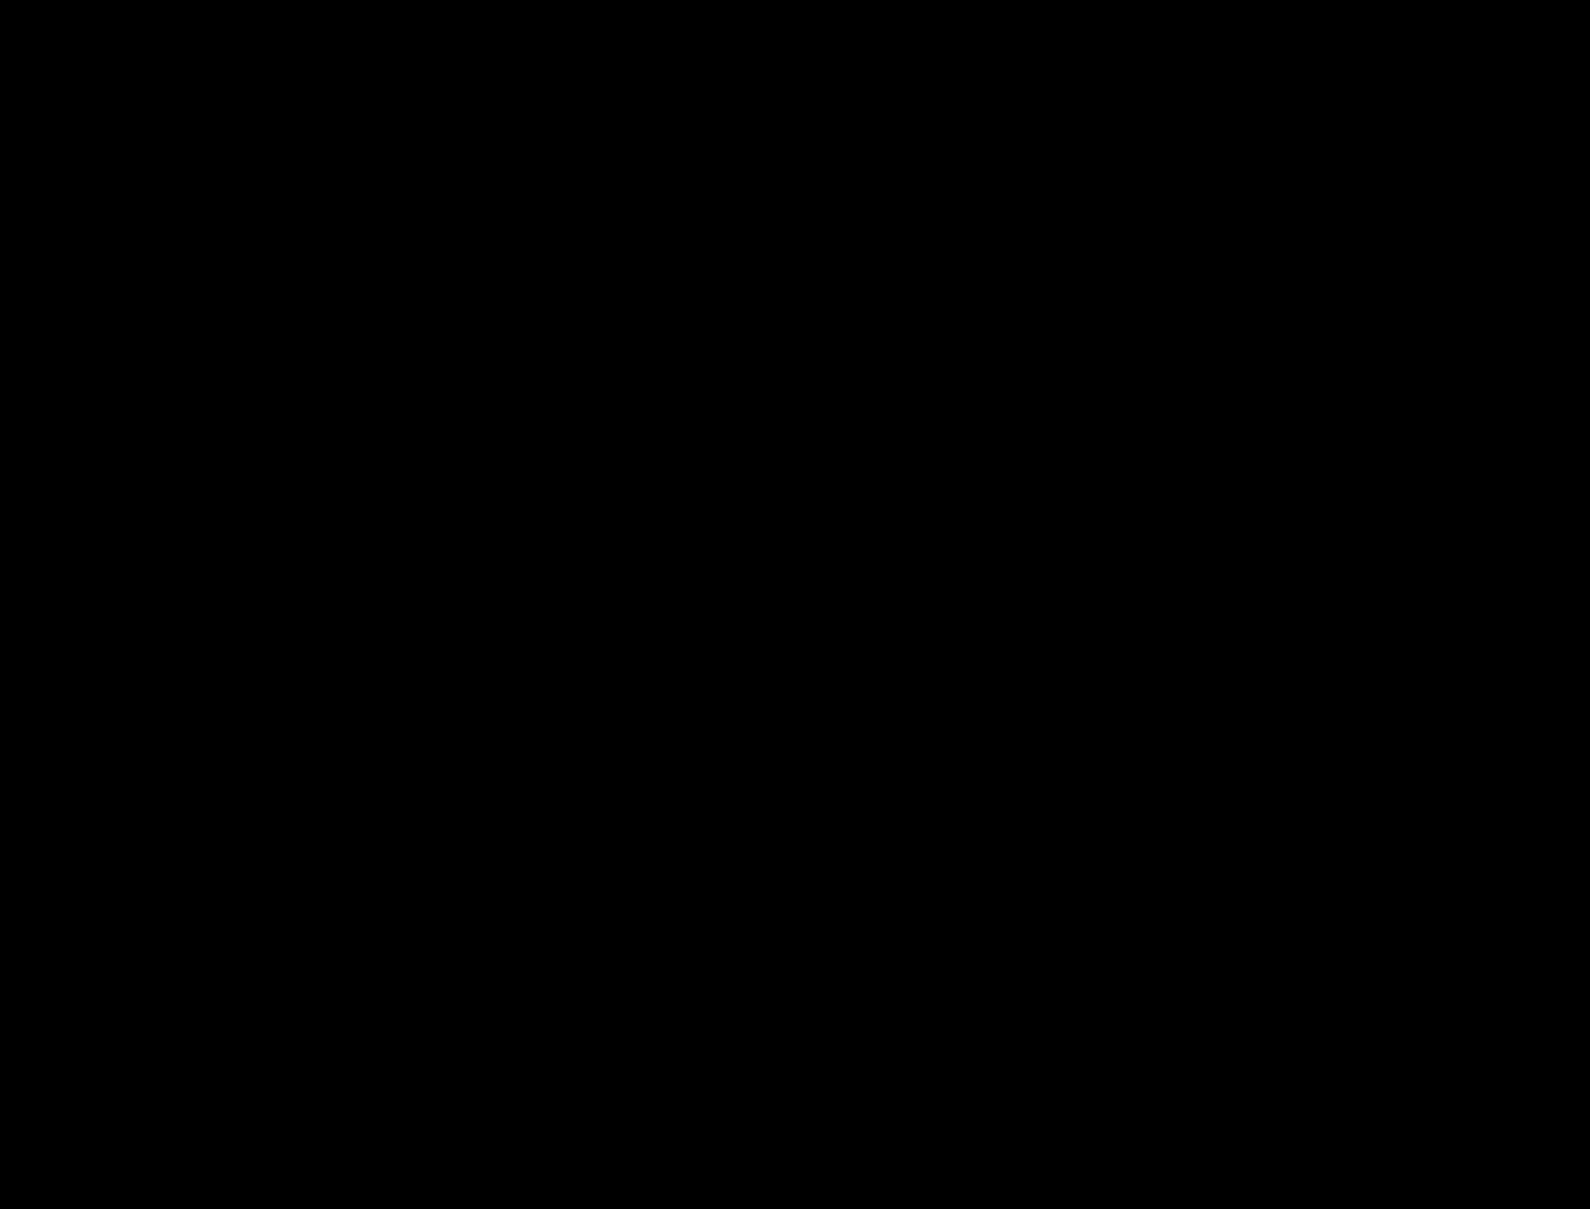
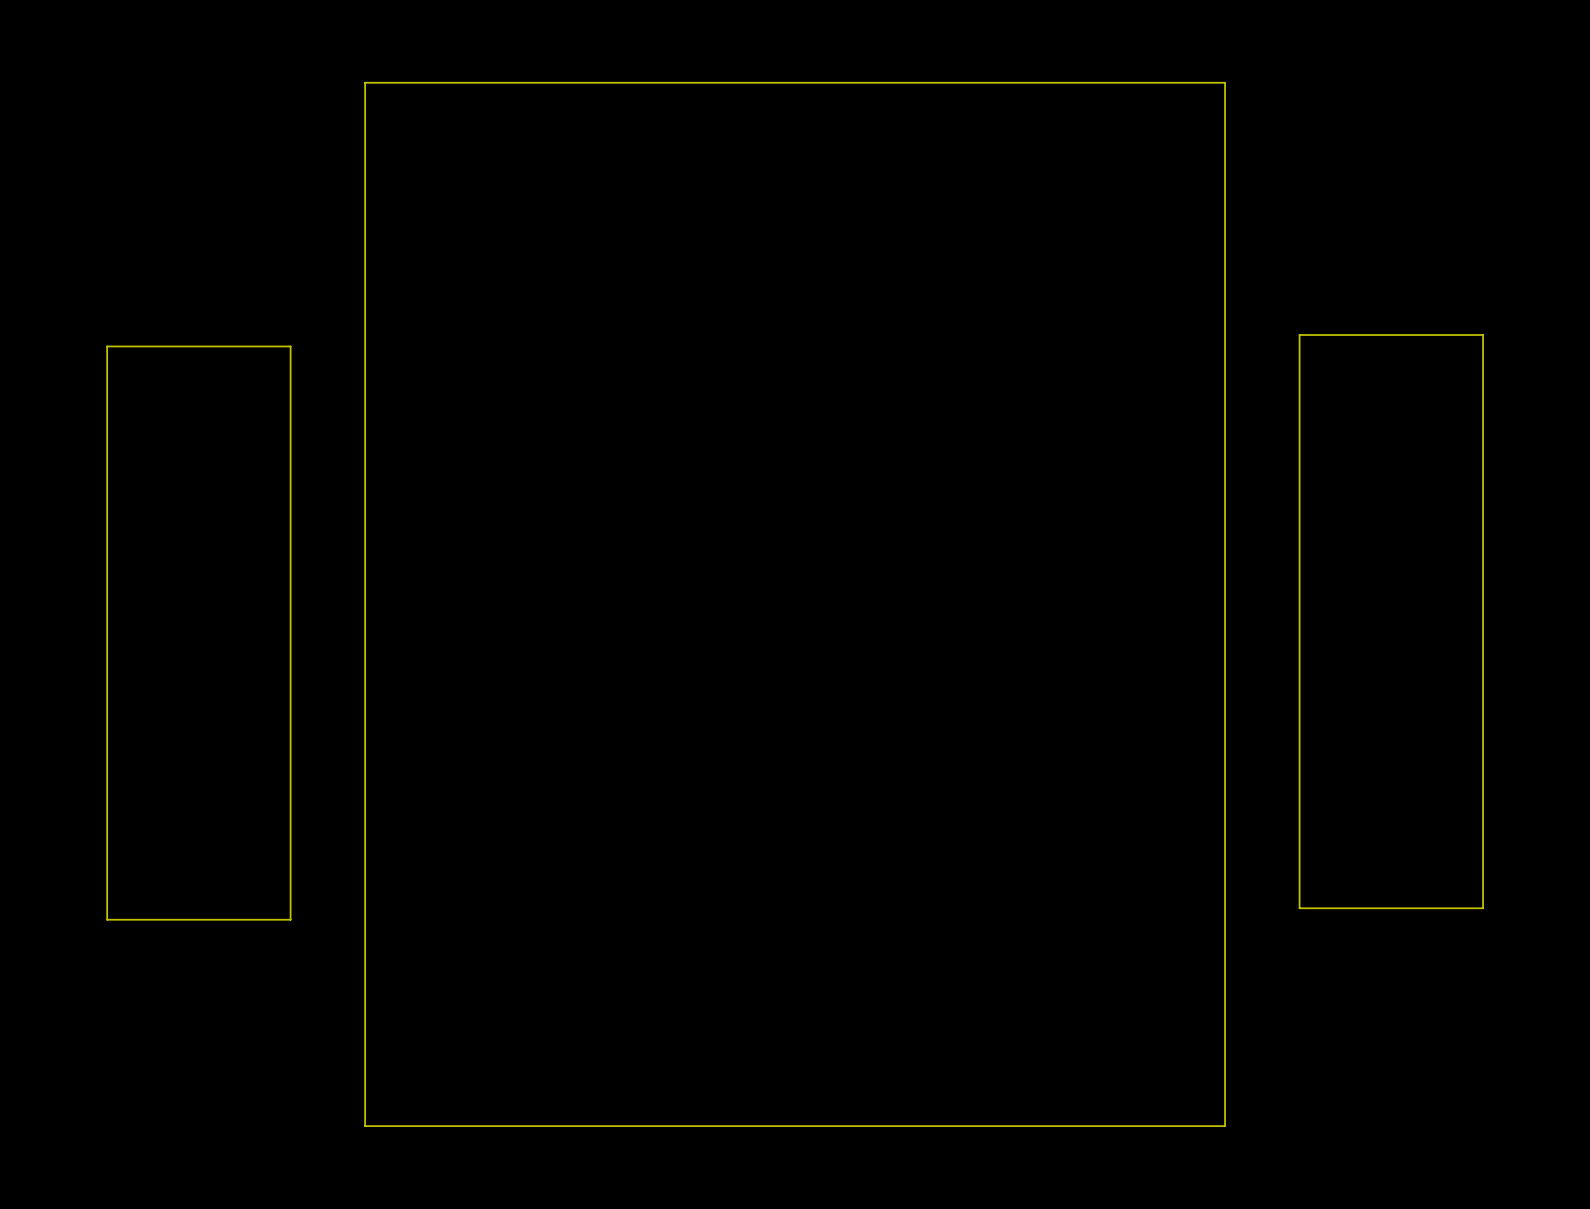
board edge: none -> (1225, 82) (365, 82) (365, 1126) (1225, 1126) (1225, 82)
board edge: none -> (1483, 334) (1299, 334) (1299, 908) (1483, 908) (1483, 334)
board edge: none -> (290, 346) (107, 346) (107, 919) (290, 919) (290, 346)

